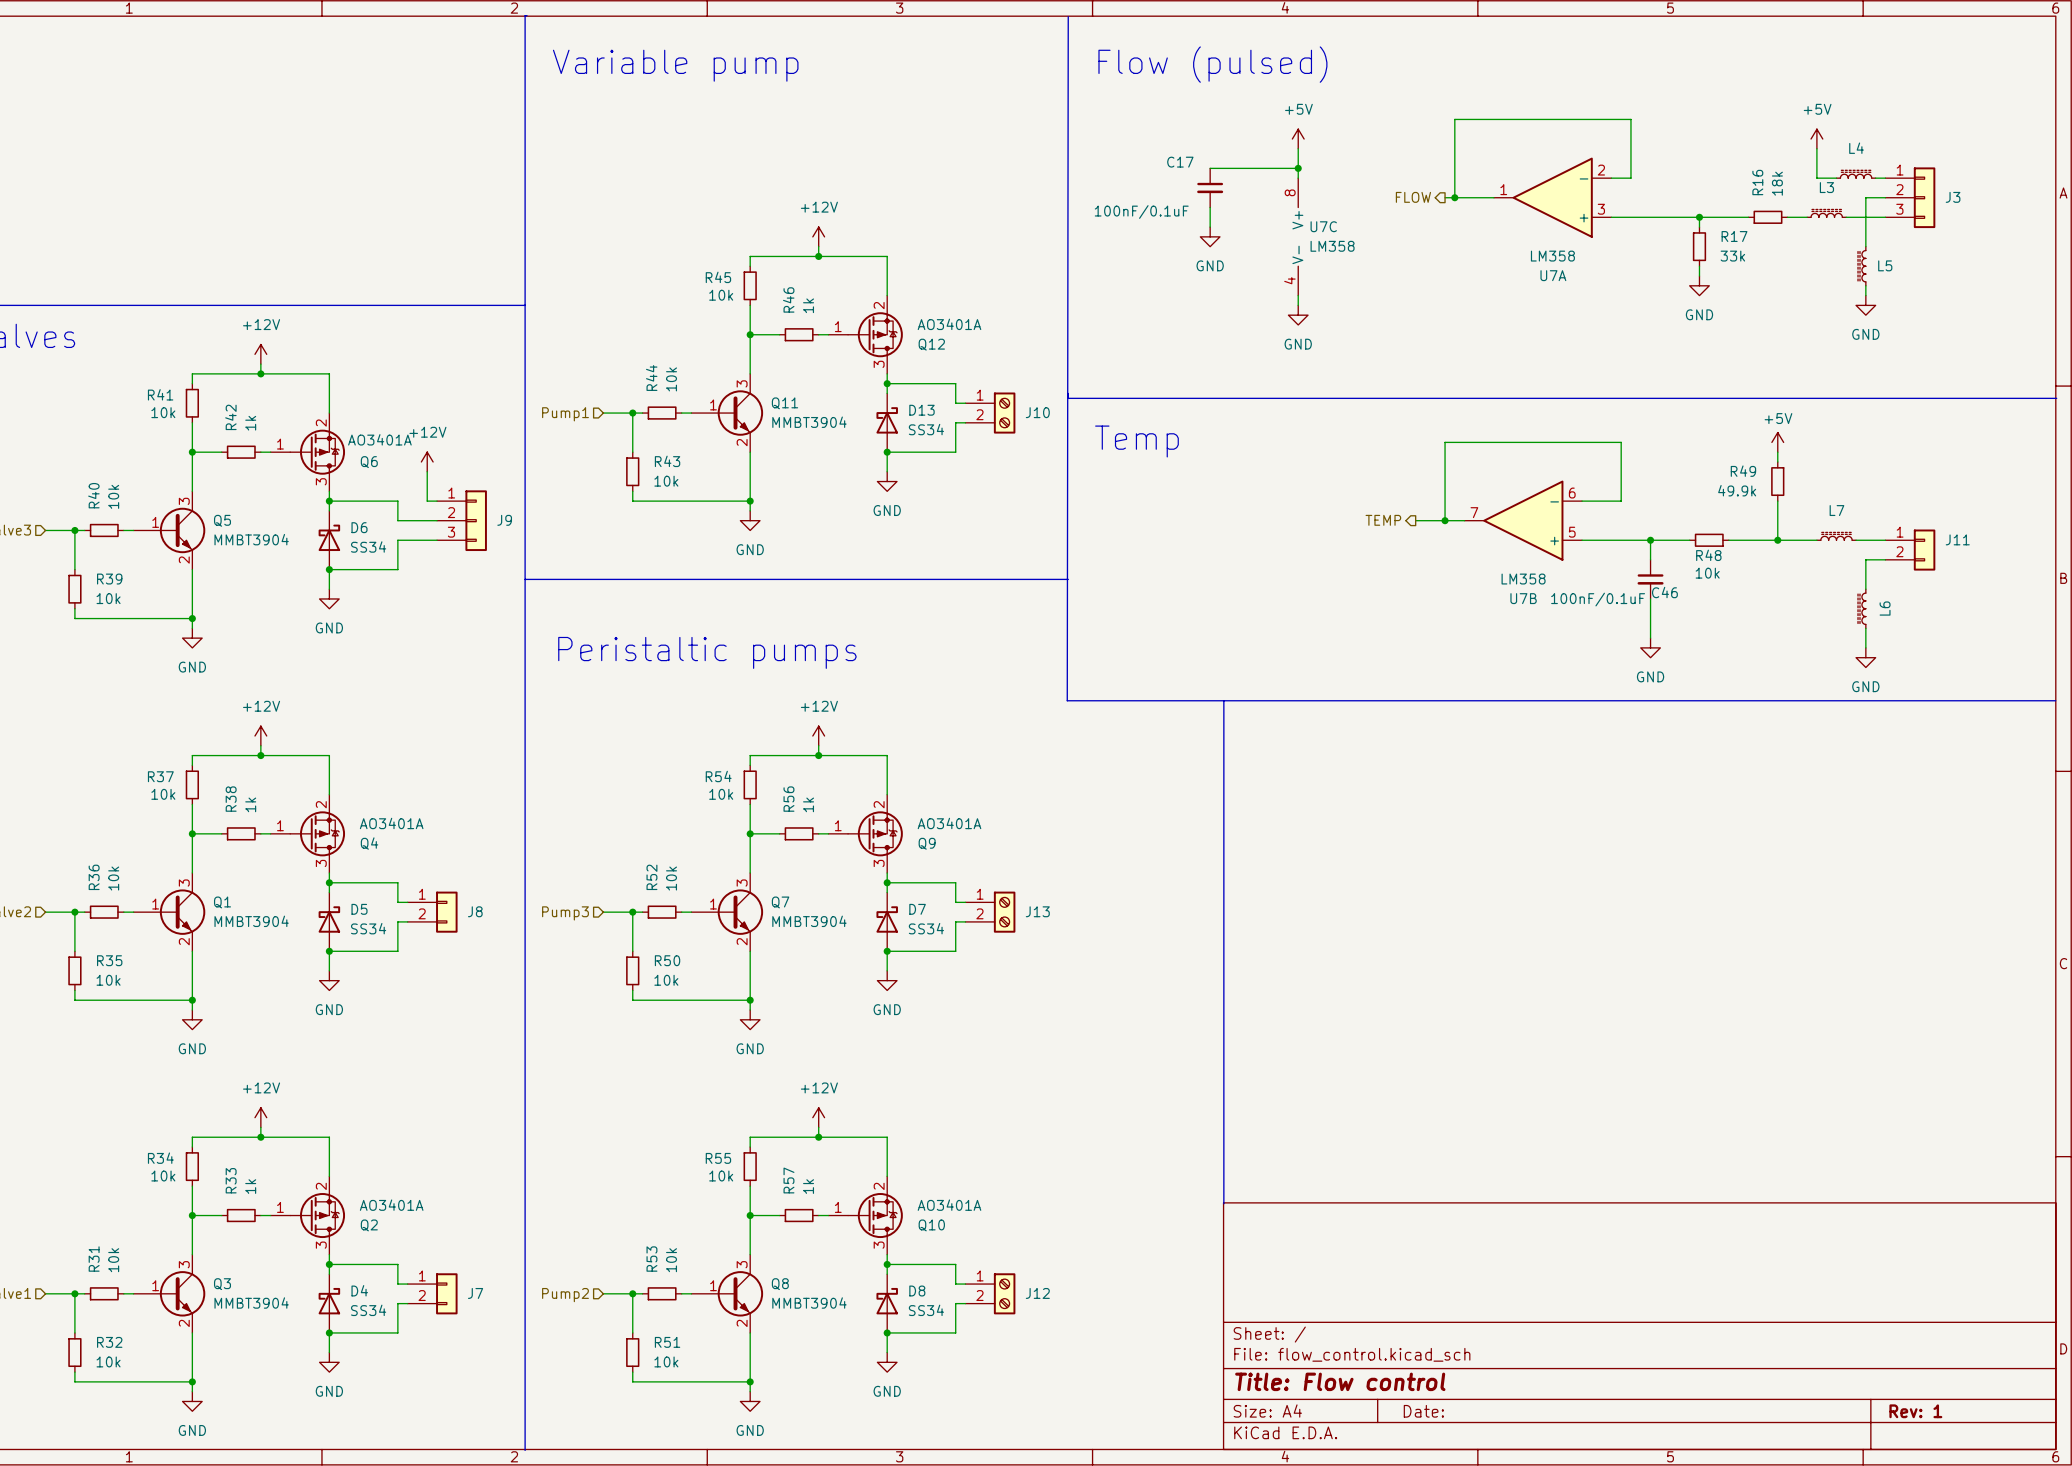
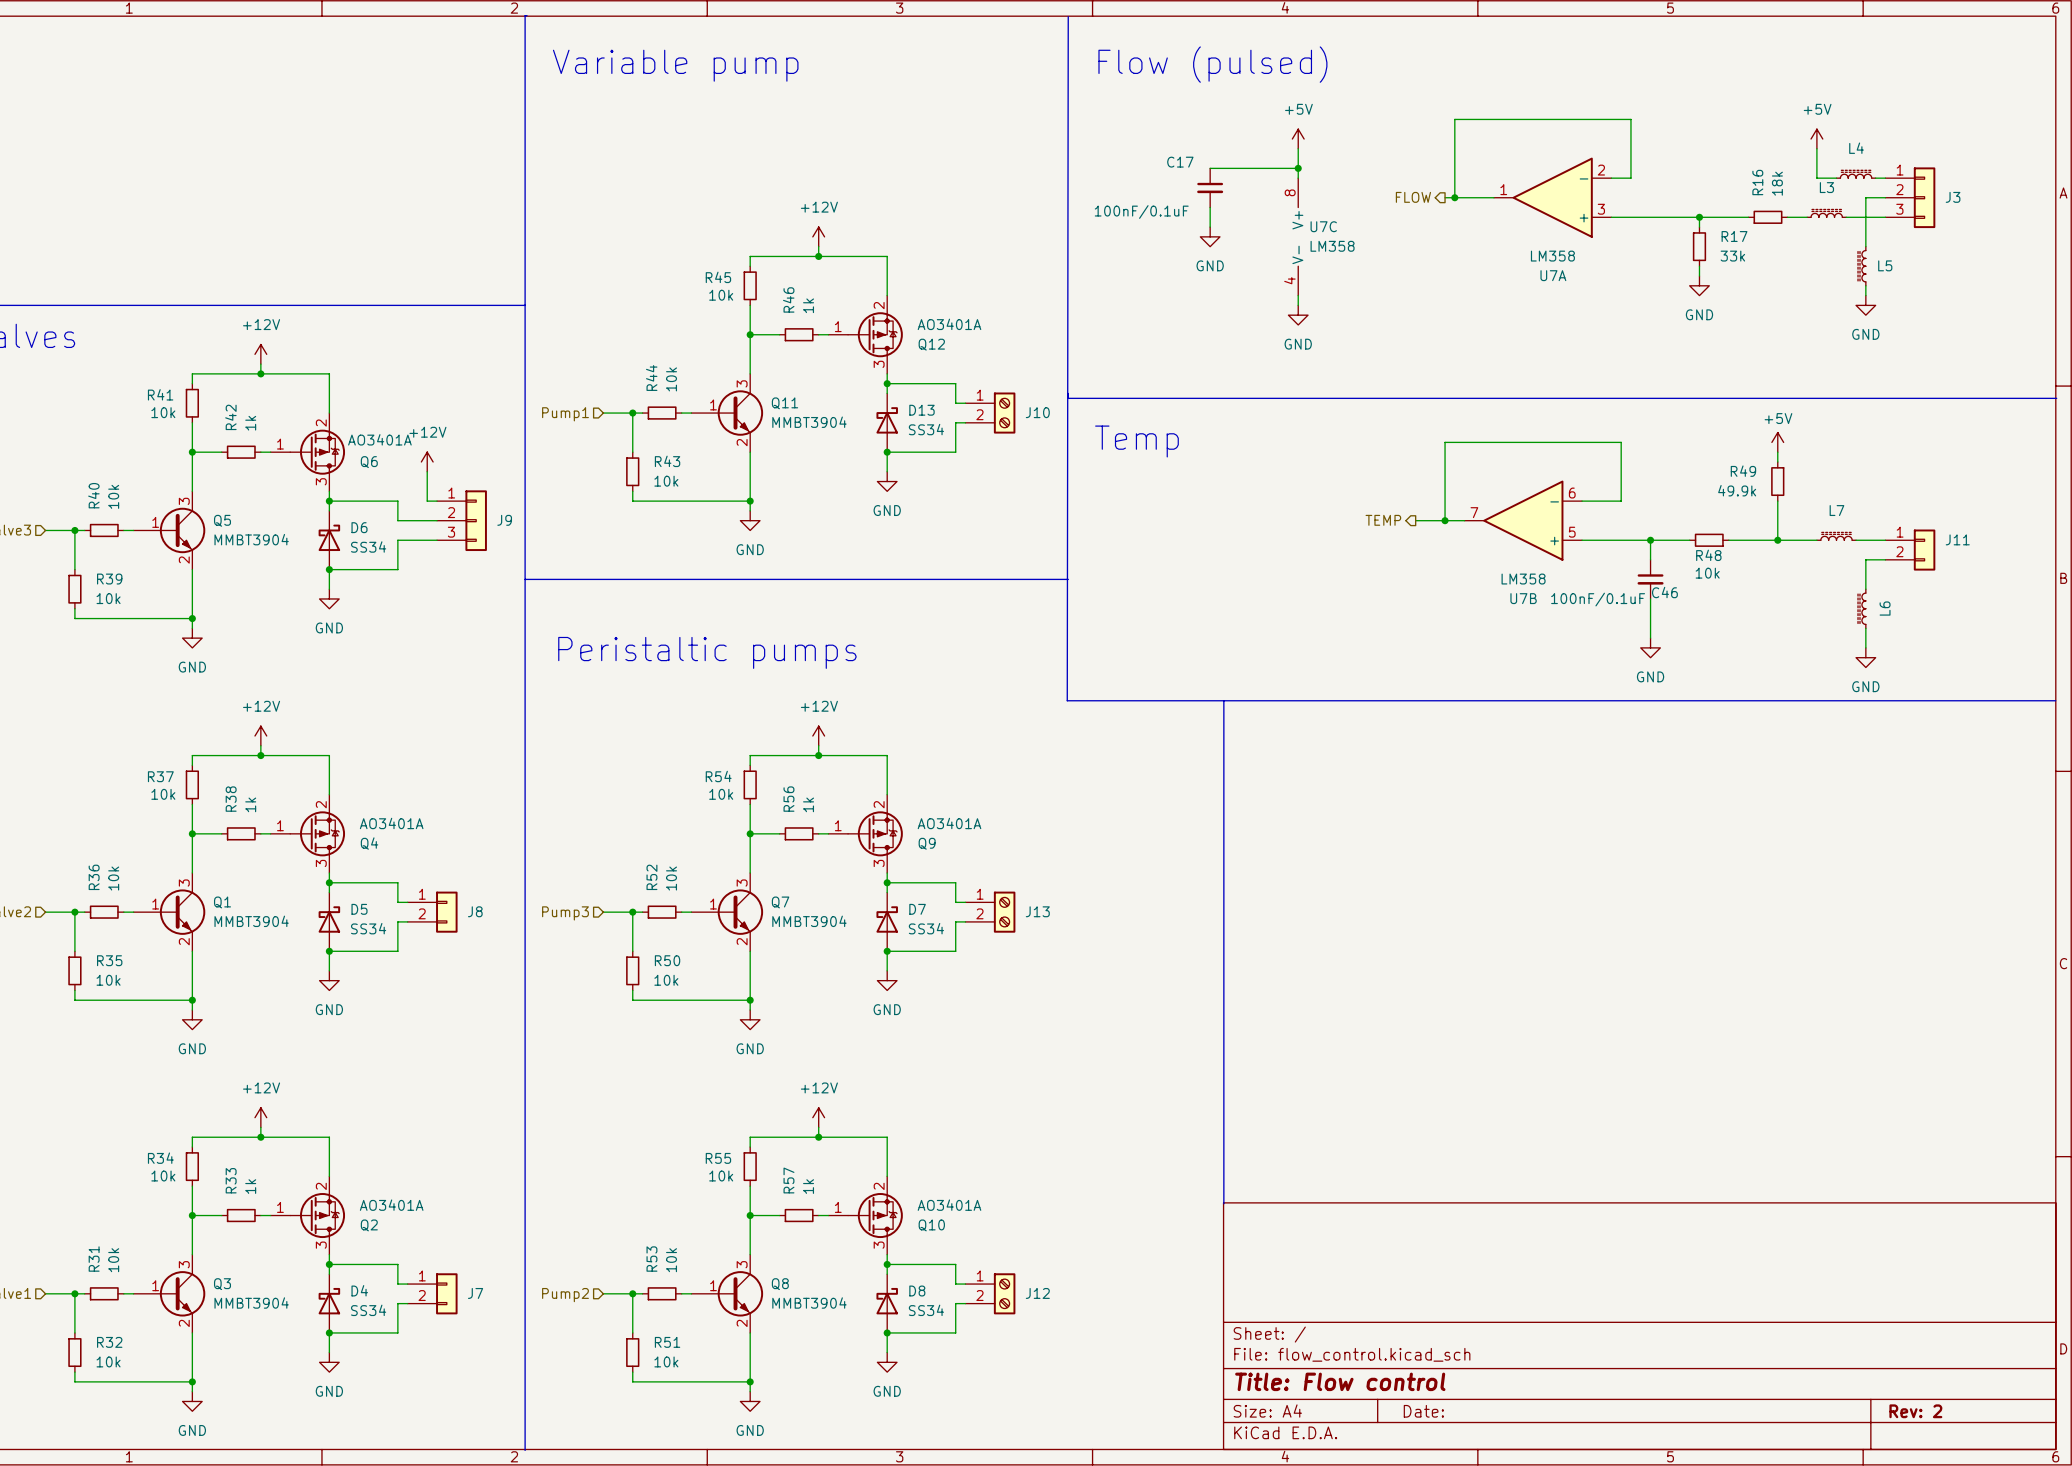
title block: Rev: 1 (1915, 1411) -> Rev: 2 (1915, 1411)

